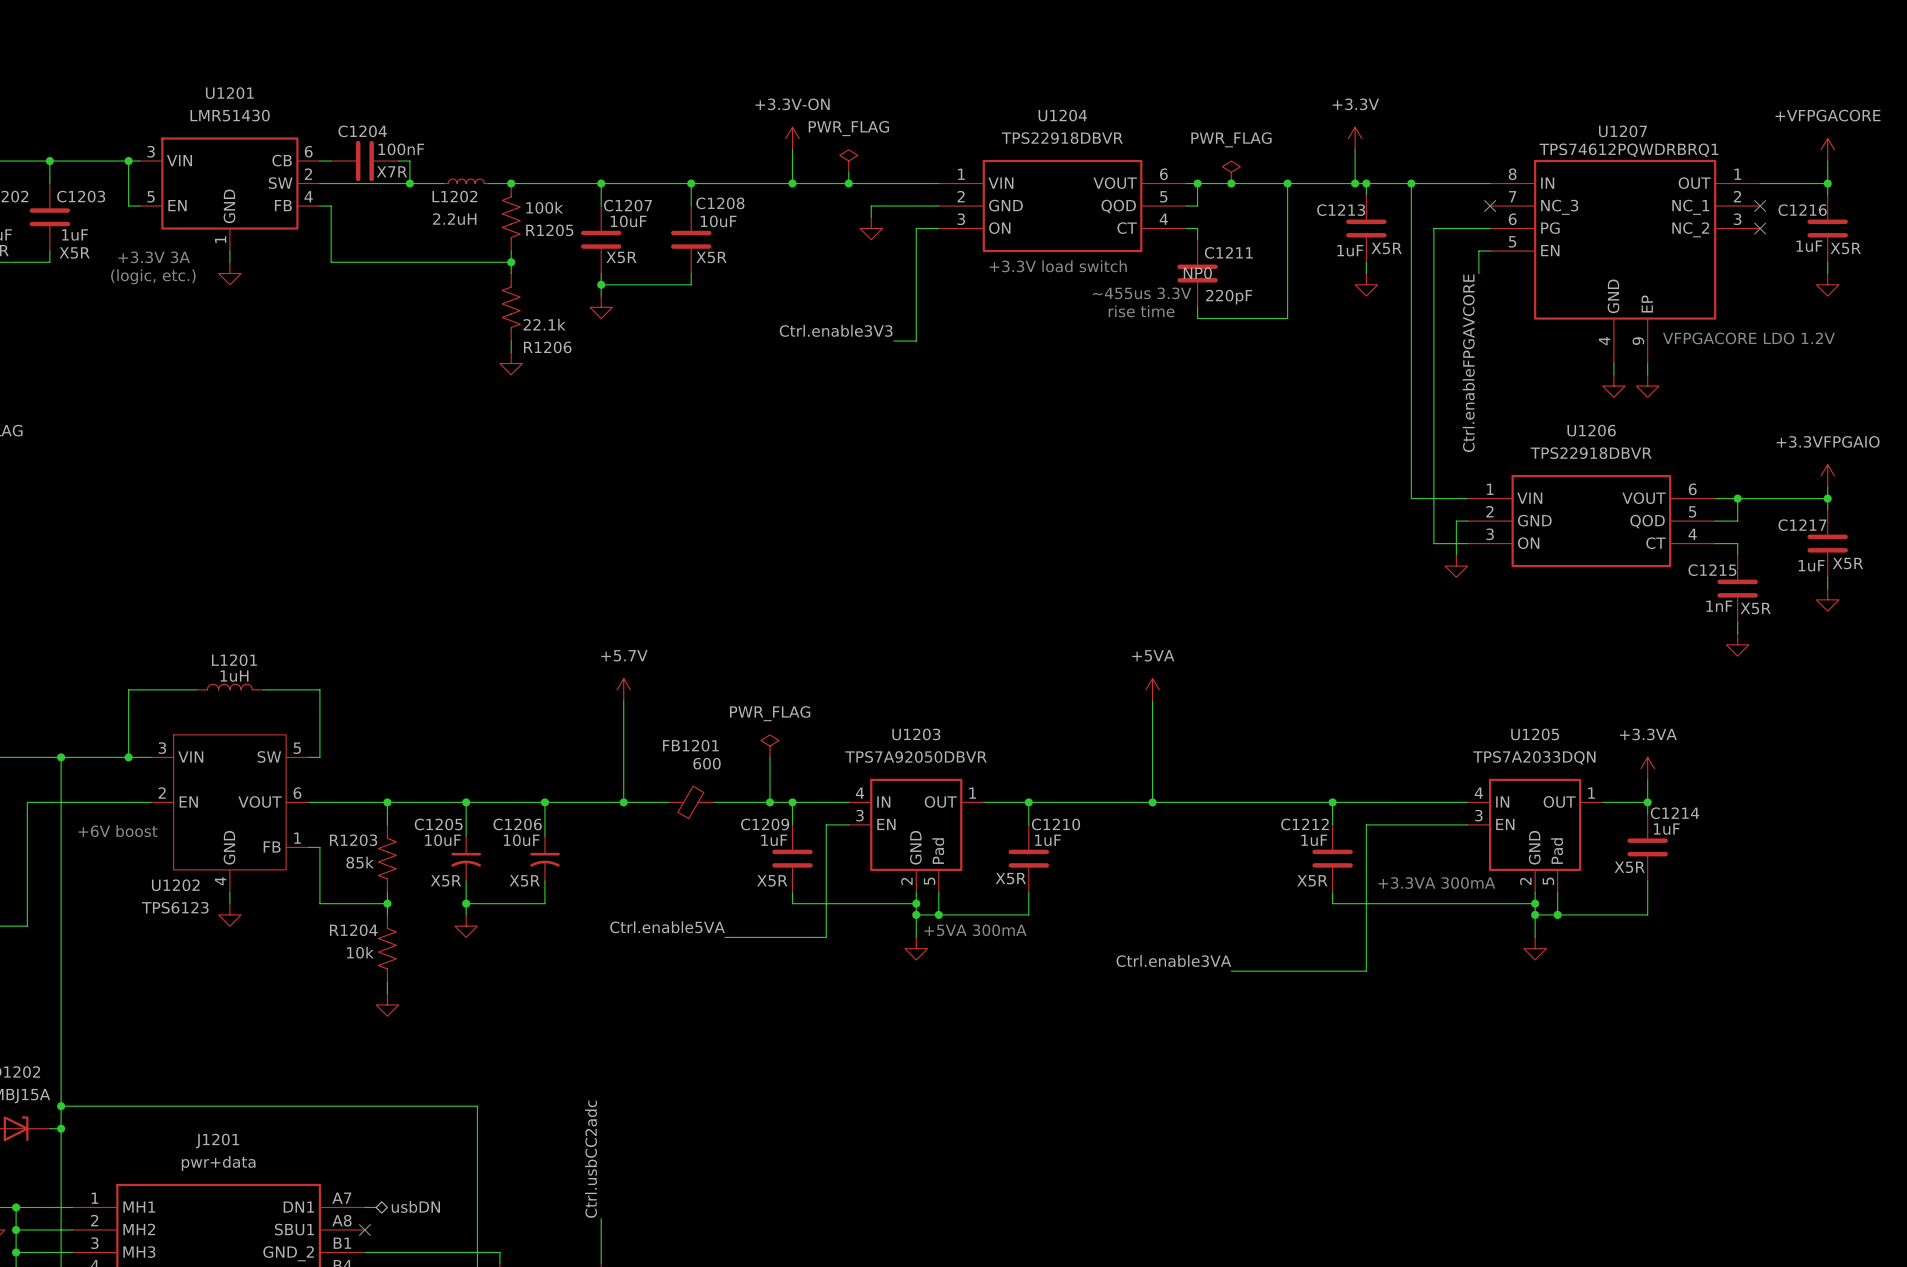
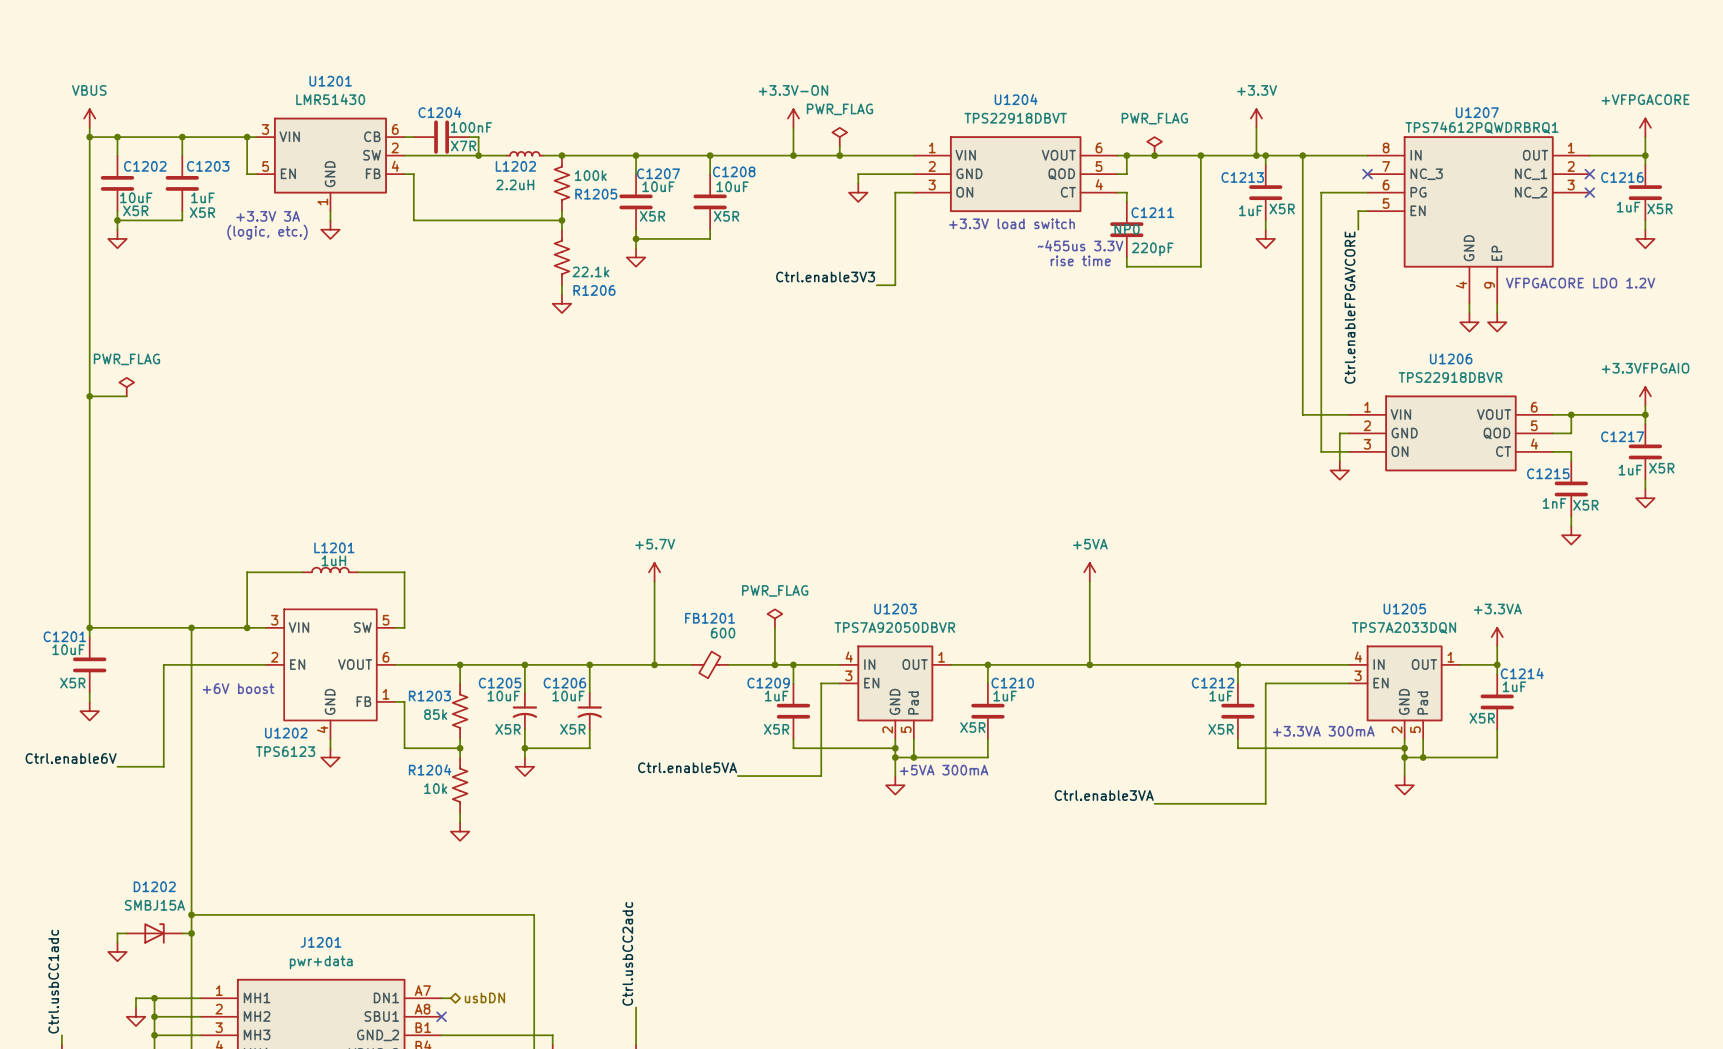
U1204 value: TPS22918DBVR (1062, 138) -> TPS22918DBVT (1015, 118)

